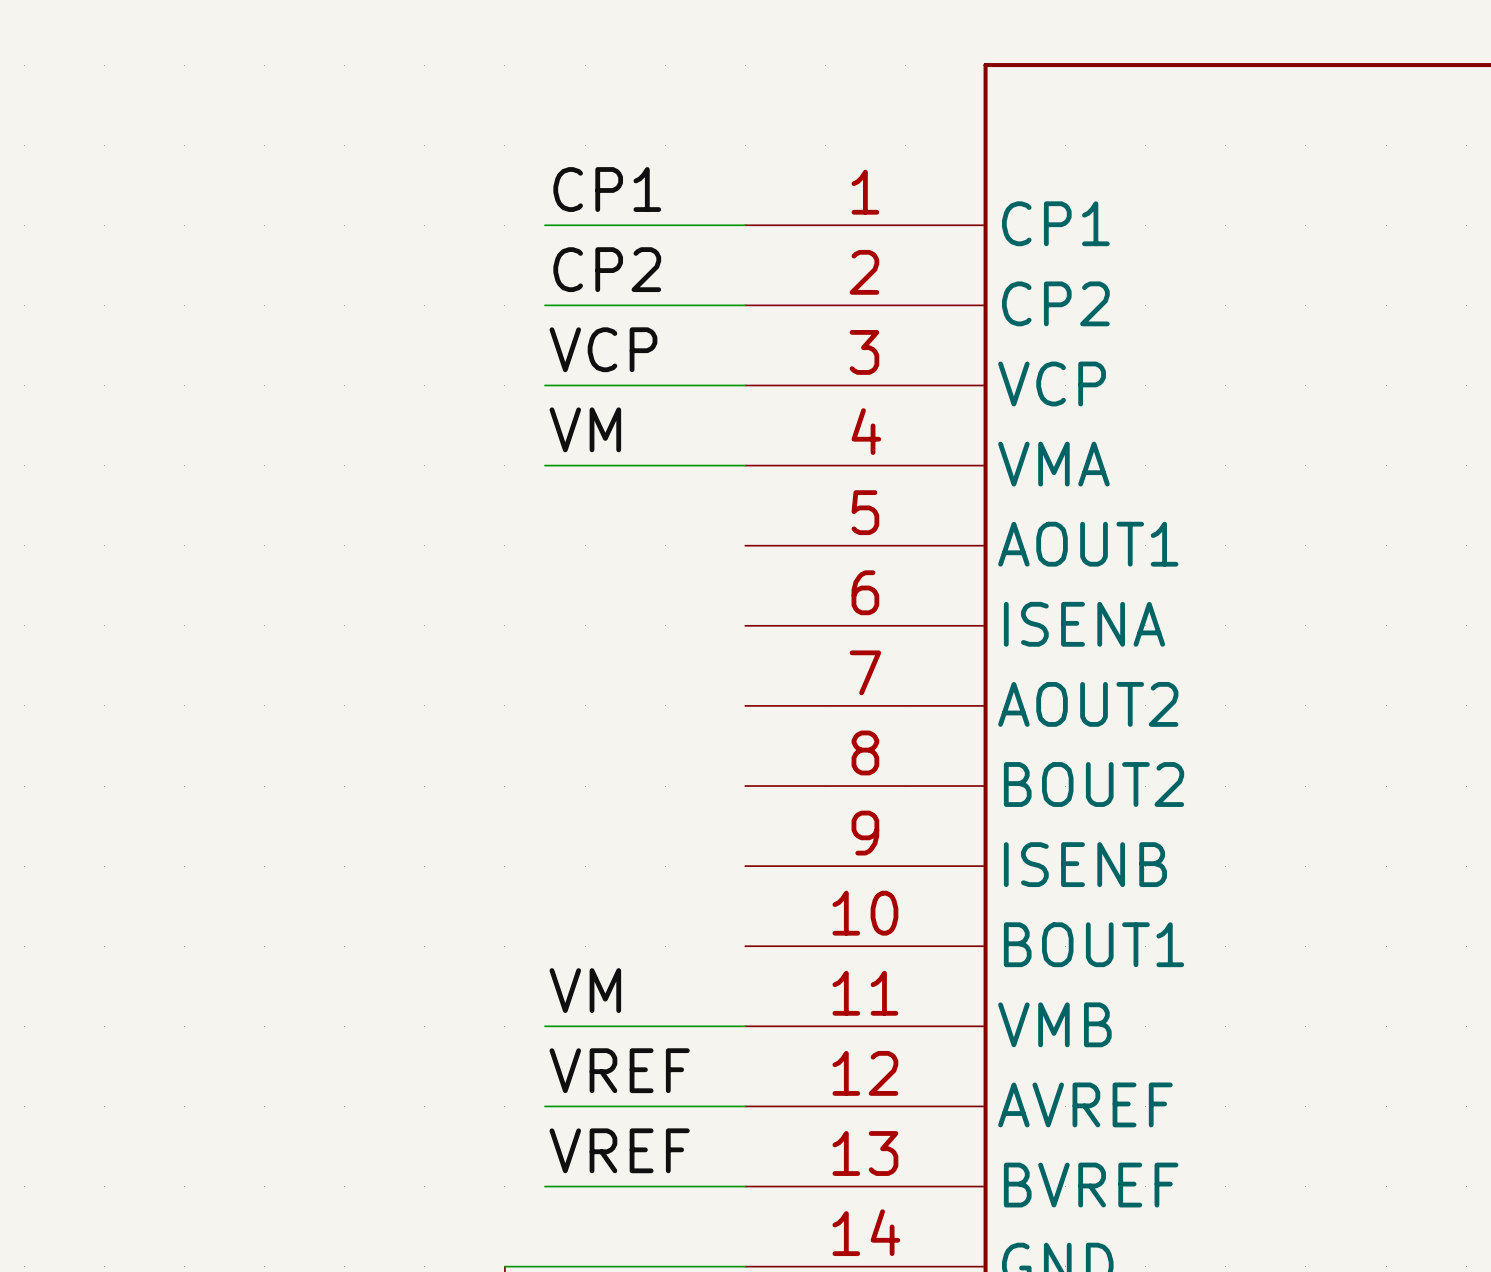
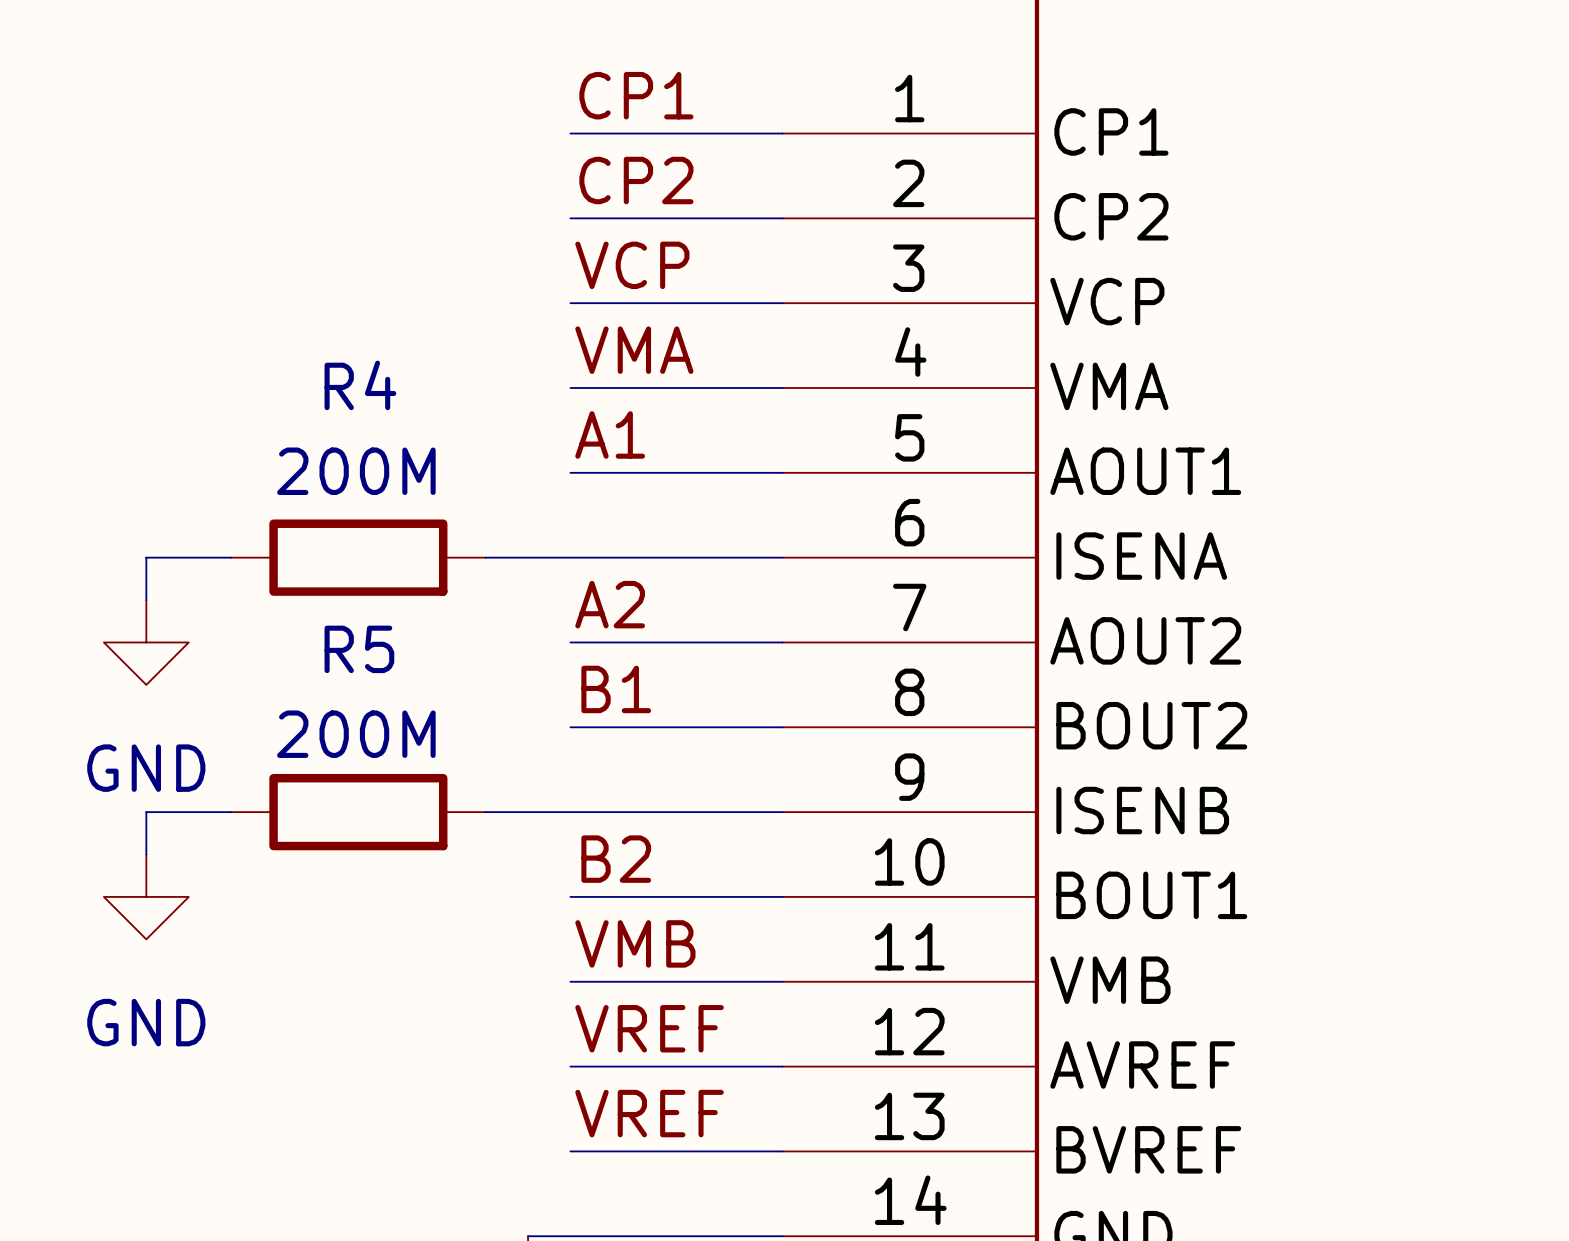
label: VM (585, 429) -> VMA (634, 350)
label: none -> A1 (610, 434)
wire: none -> (570, 472) (782, 472)
wire: none -> (231, 557) (146, 557) (146, 600)
R4: none -> 200M (358, 557)
wire: none -> (485, 557) (782, 557)
label: none -> A2 (610, 604)
power symbol: none -> GND (146, 642)
wire: none -> (570, 642) (782, 642)
label: none -> B1 (616, 689)
wire: none -> (570, 727) (782, 727)
wire: none -> (231, 812) (146, 812) (146, 854)
R5: none -> 200M (358, 812)
wire: none -> (485, 812) (782, 812)
label: none -> B2 (616, 859)
power symbol: none -> GND (146, 896)
wire: none -> (570, 896) (782, 896)
label: VM (585, 990) -> VMB (635, 943)

